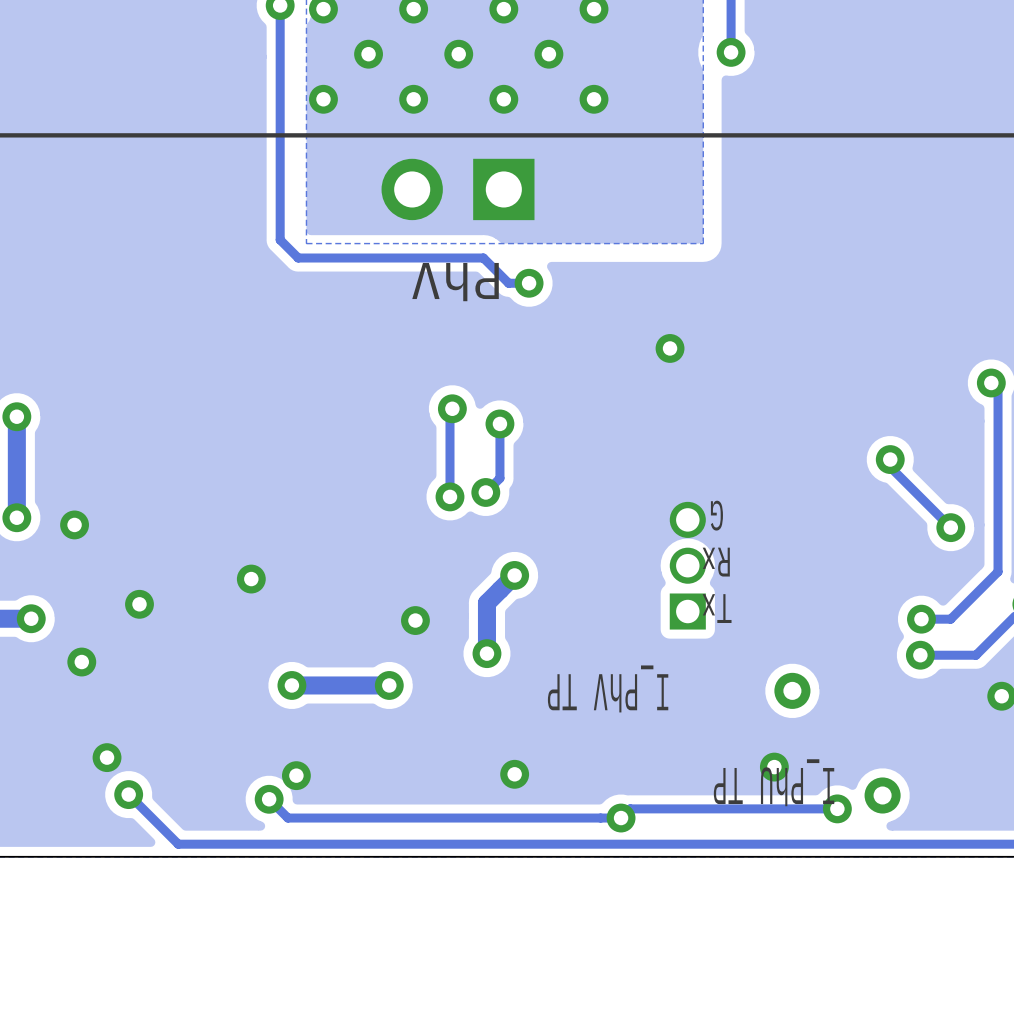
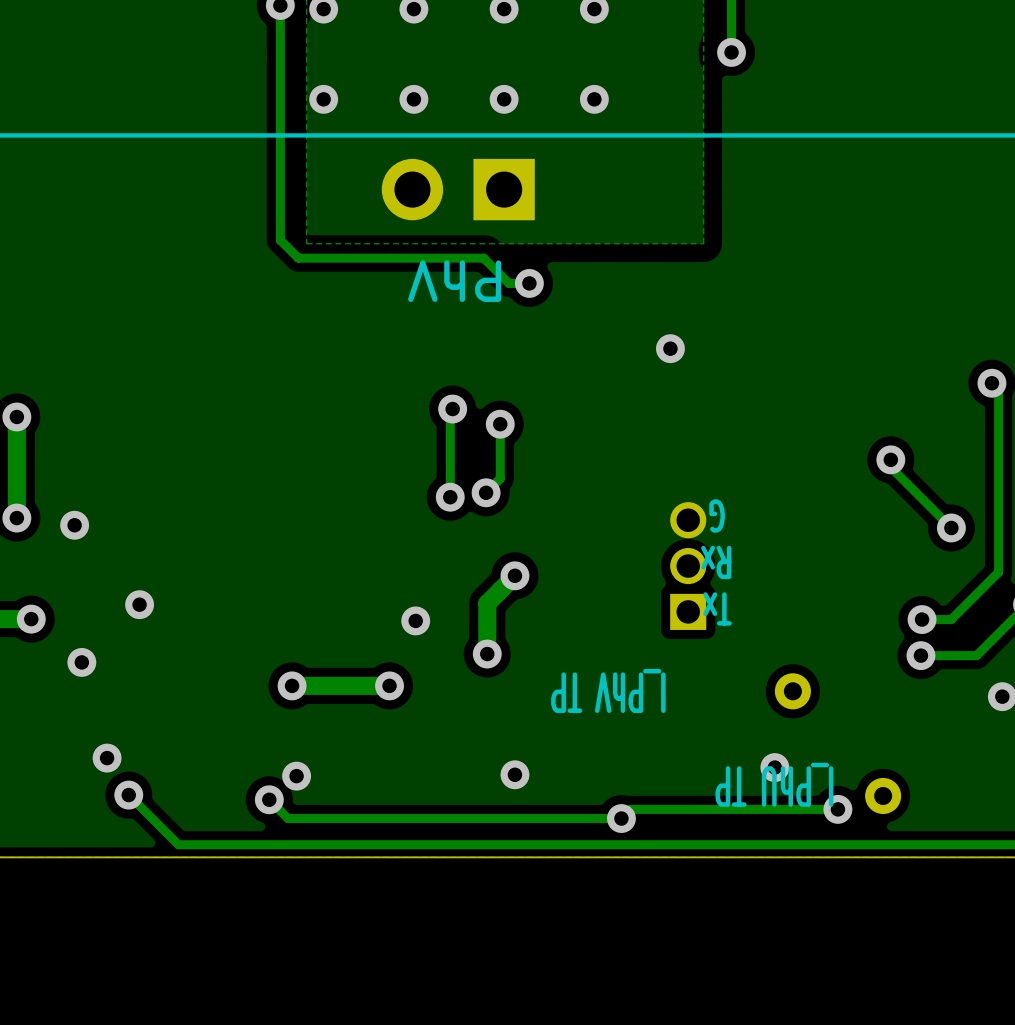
via: (368, 54) -> none
via: (458, 54) -> none
via: (548, 54) -> none
via: (251, 579) -> none

